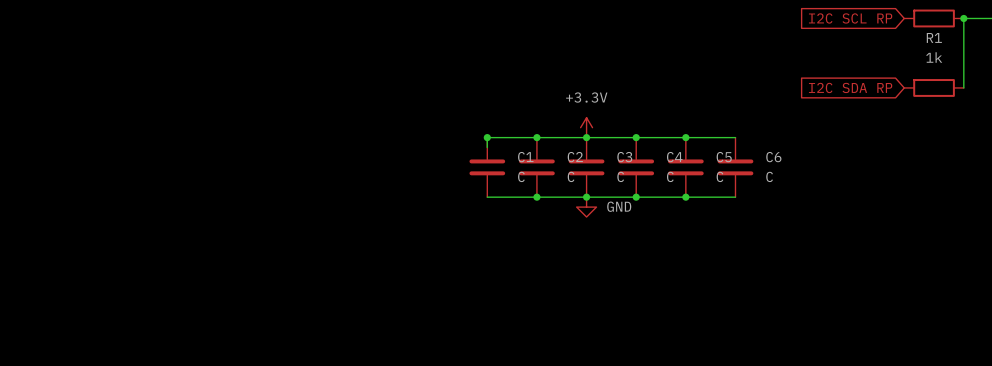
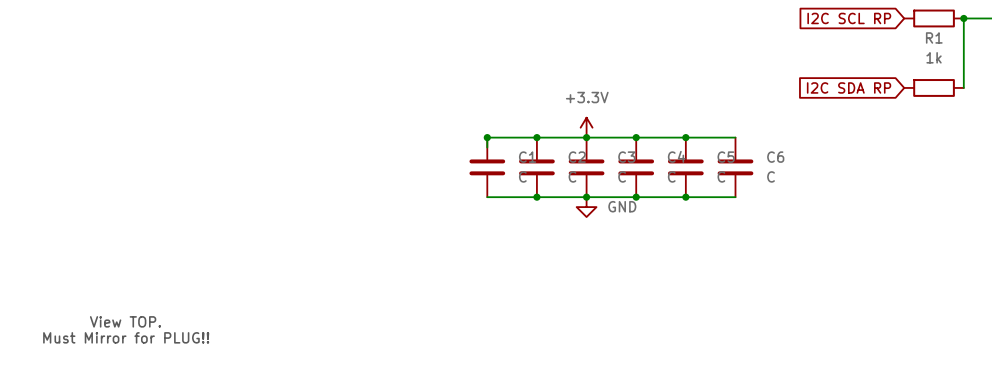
text: none -> View TOP. (125, 321)
text: none -> Must Mirror for PLUG!! (126, 337)

